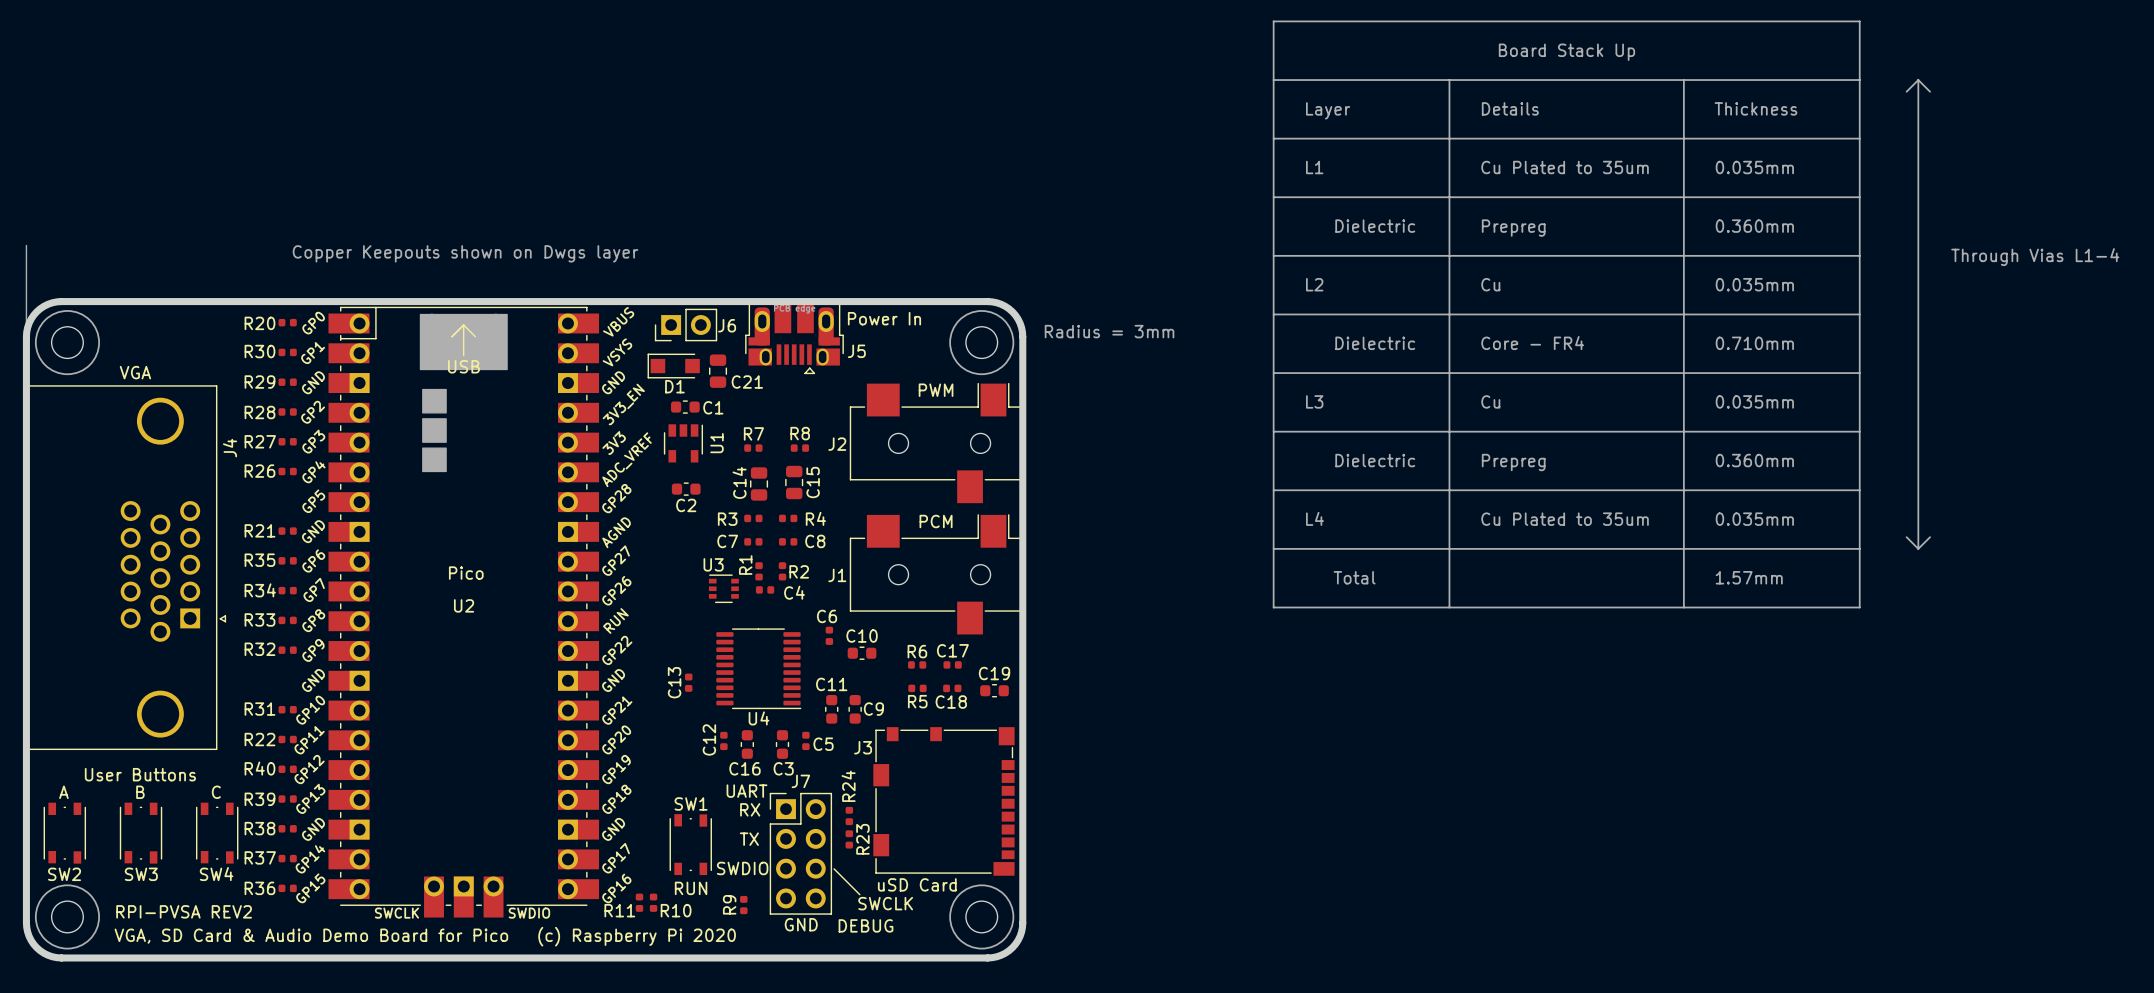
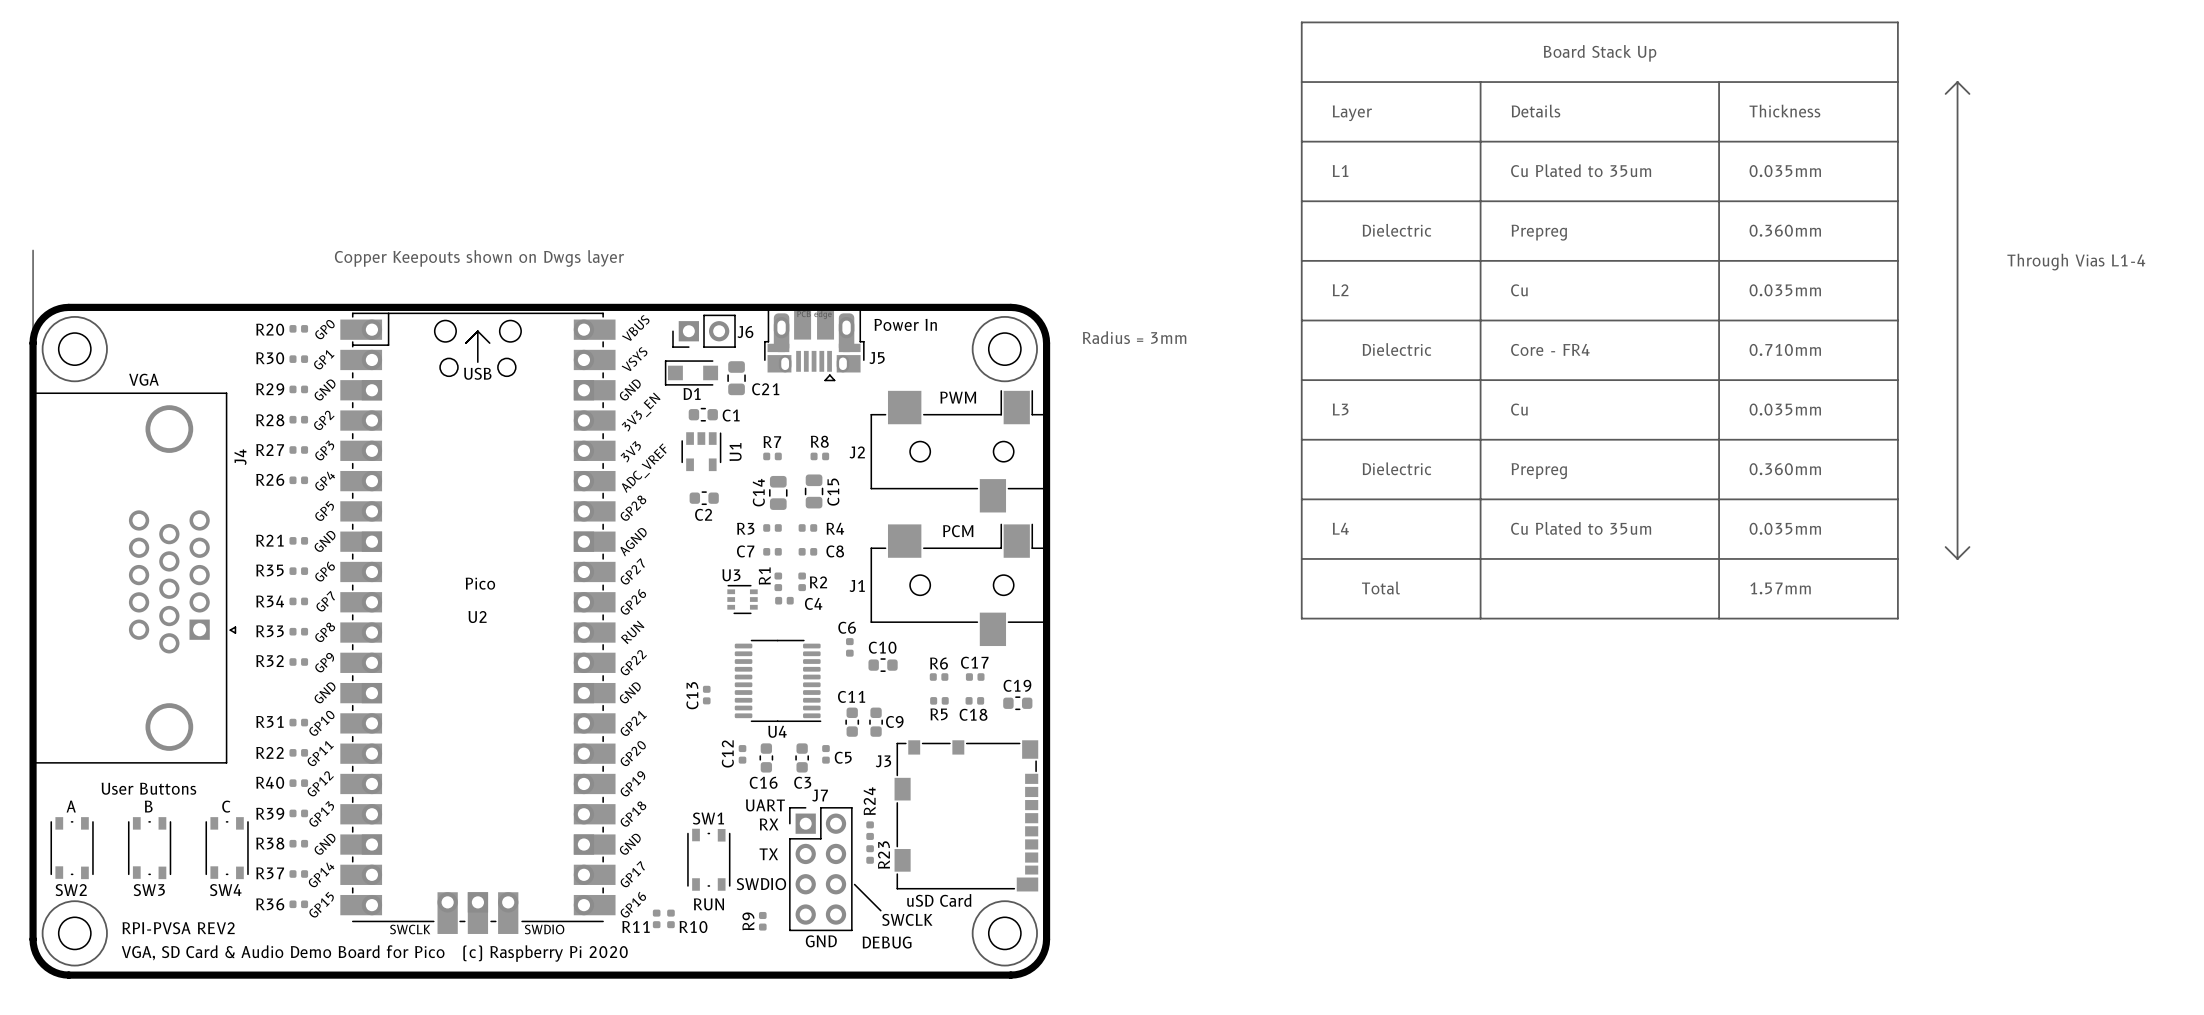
U2 footprint: [328, 306, 600, 918] -> [340, 312, 616, 934]

